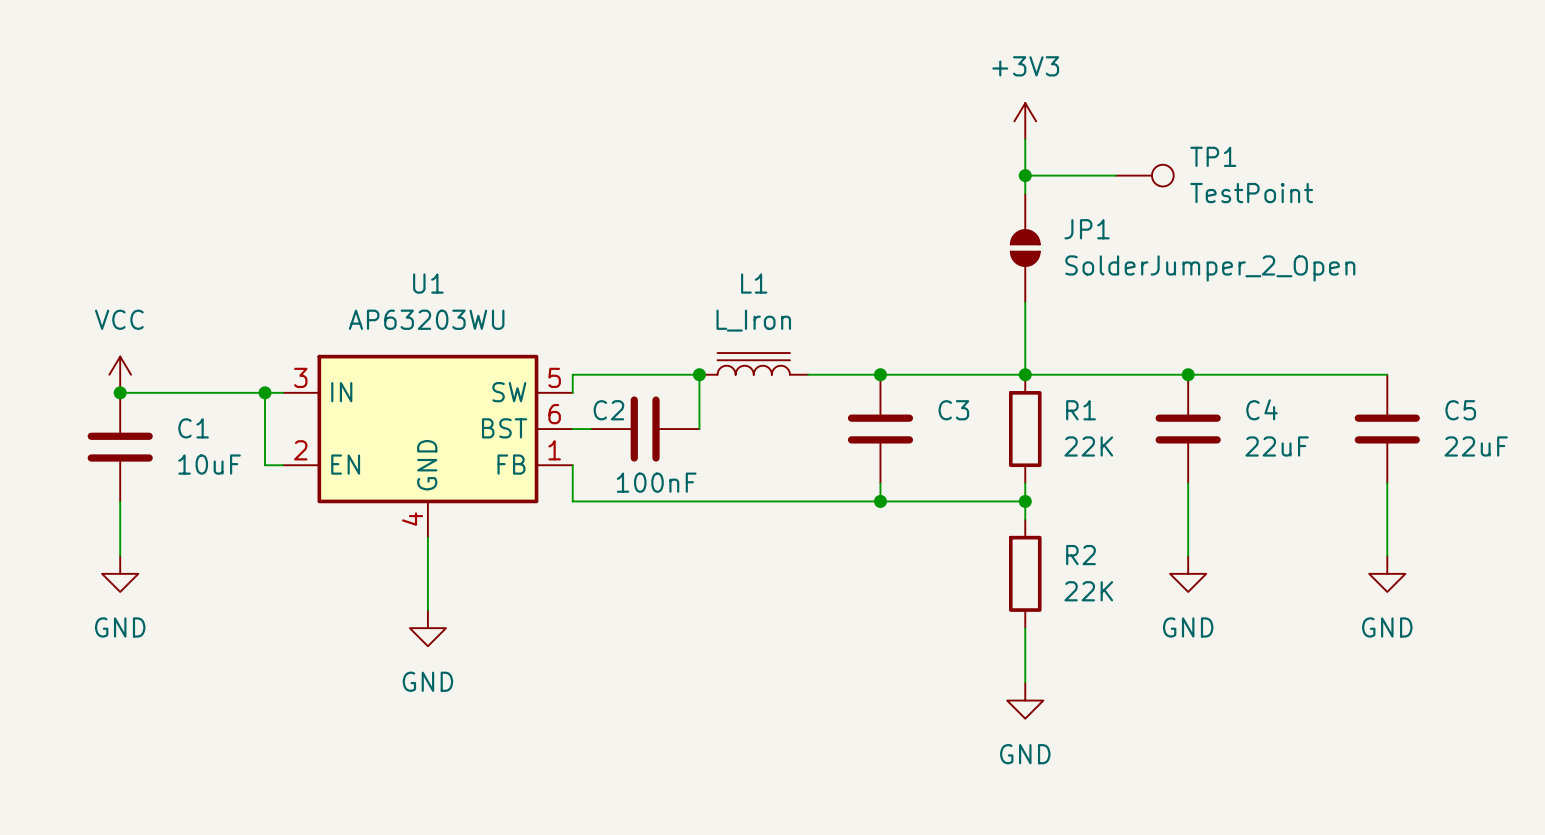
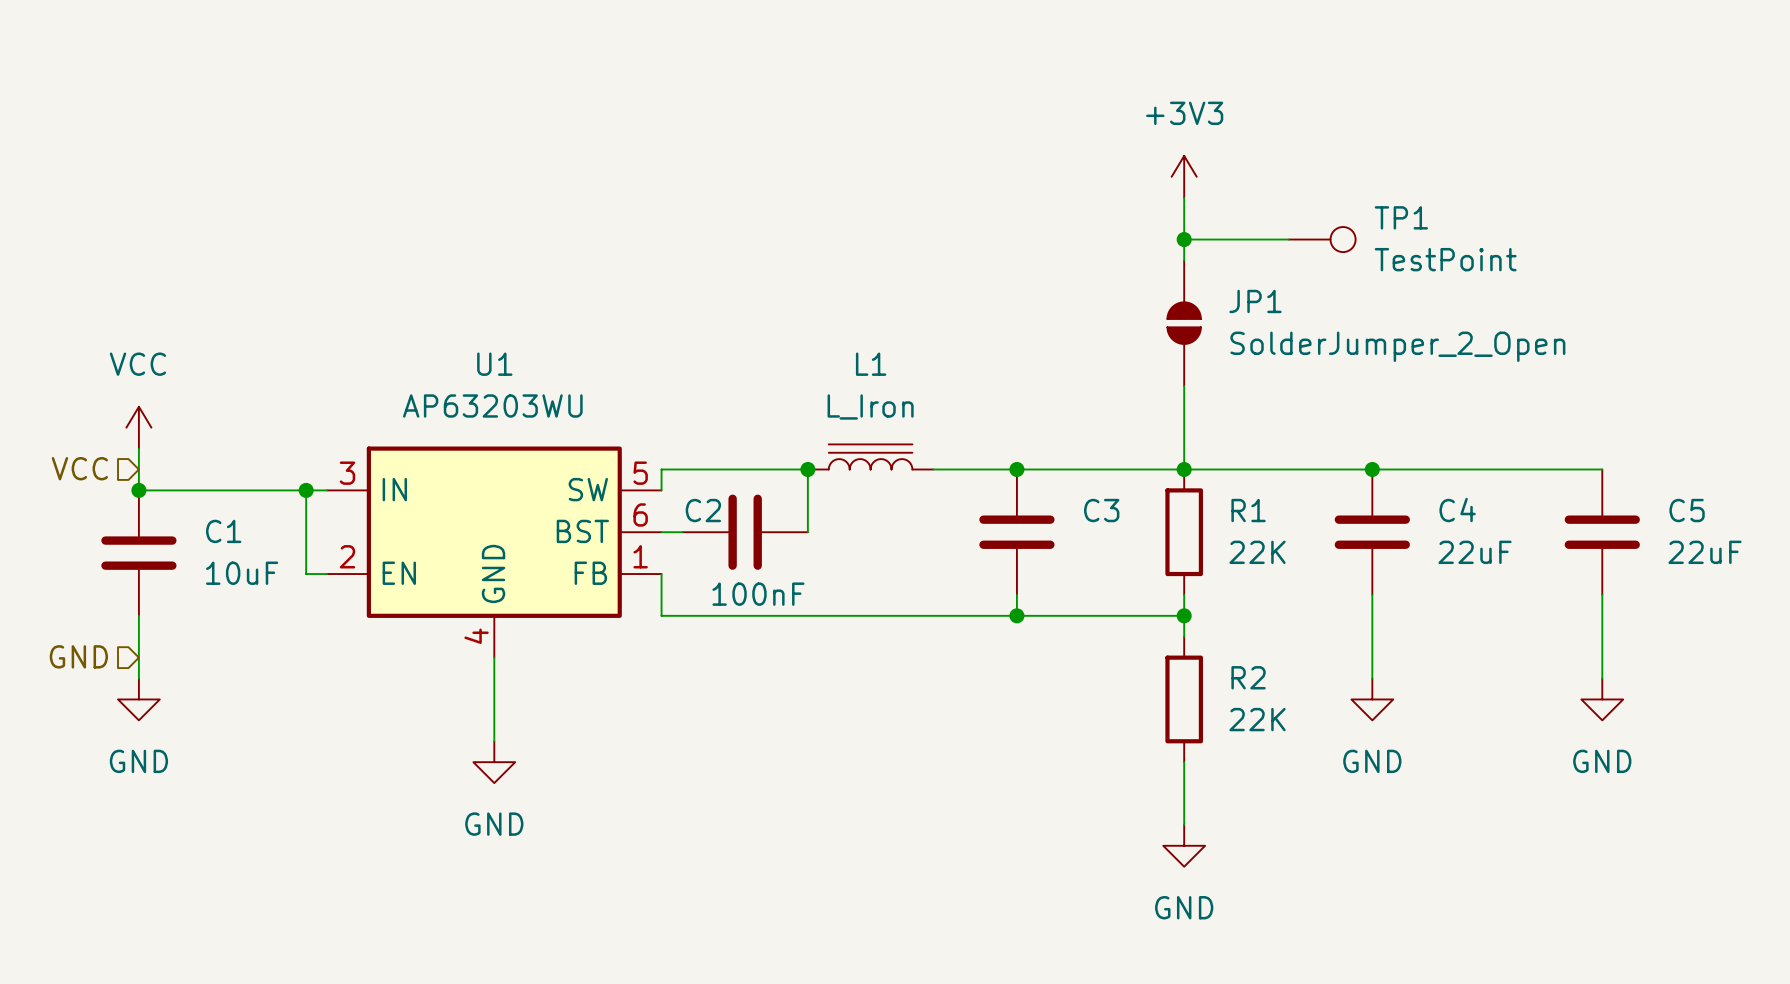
hierarchical label: none -> VCC (79, 468)
power symbol position: VCC (120, 374) -> VCC (138, 427)
hierarchical label: none -> GND (78, 656)

